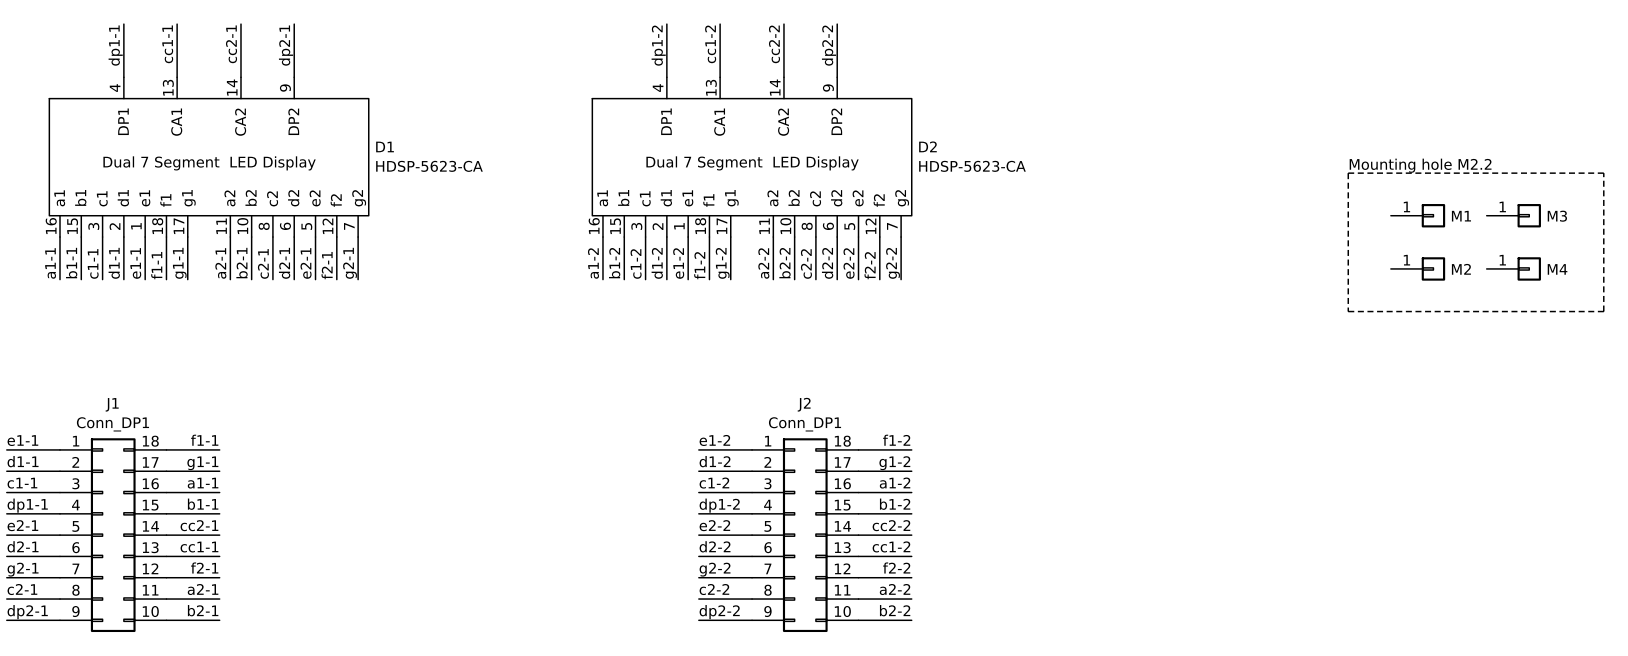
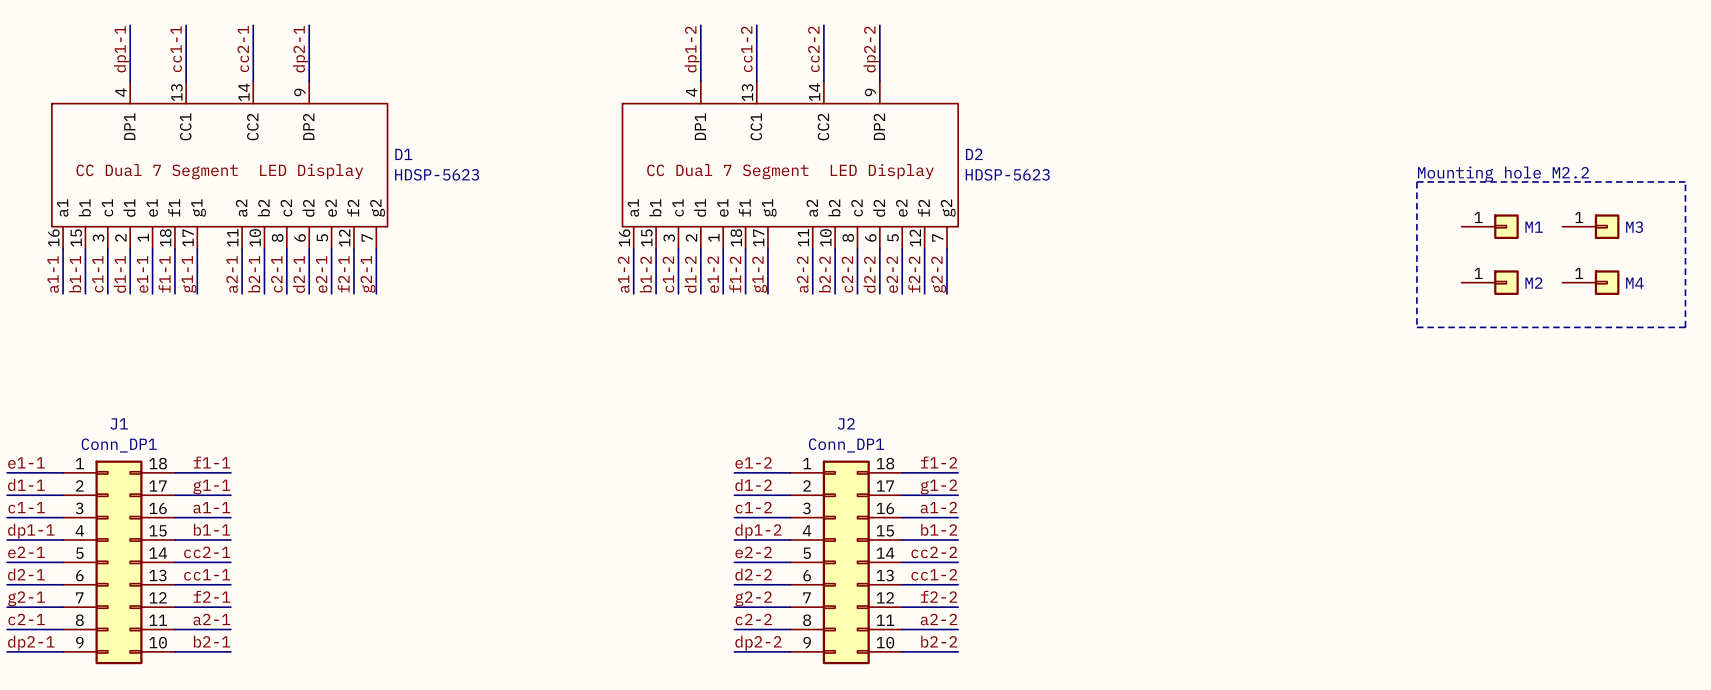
D1 pin name: CA1 (176, 122) -> CC1 (185, 126)
D1 pin name: CA2 (240, 122) -> CC2 (252, 126)
D2 pin name: CA1 (719, 122) -> CC1 (756, 126)
D2 pin name: CA2 (783, 122) -> CC2 (823, 126)
D1 text: Dual 7 Segment LED Display (209, 163) -> CC Dual 7 Segment LED Display (219, 171)
D2 text: Dual 7 Segment LED Display (752, 163) -> CC Dual 7 Segment LED Display (790, 171)
D1 value: HDSP-5623-CA (429, 166) -> HDSP-5623 (437, 174)
D2 value: HDSP-5623-CA (972, 166) -> HDSP-5623 (1007, 174)

